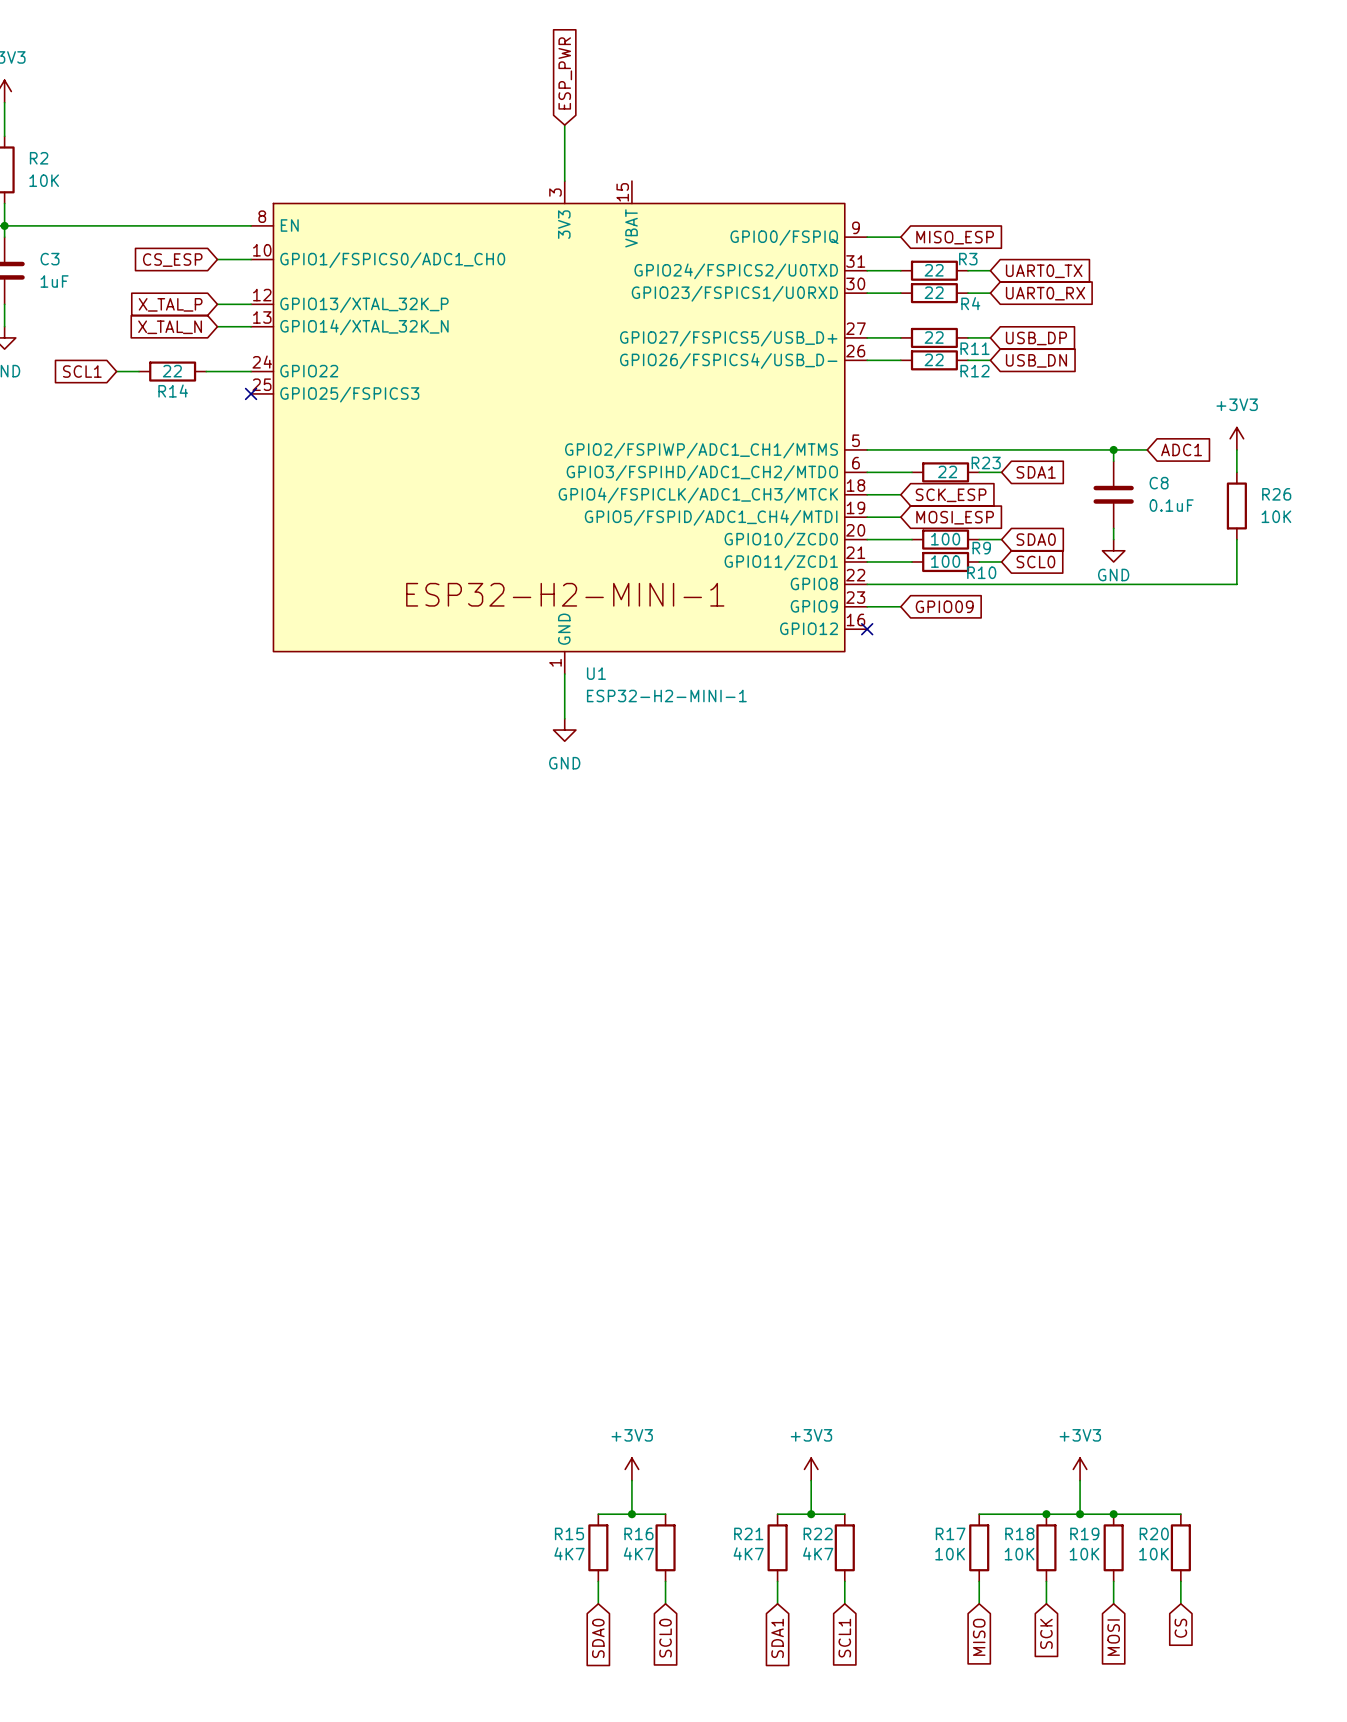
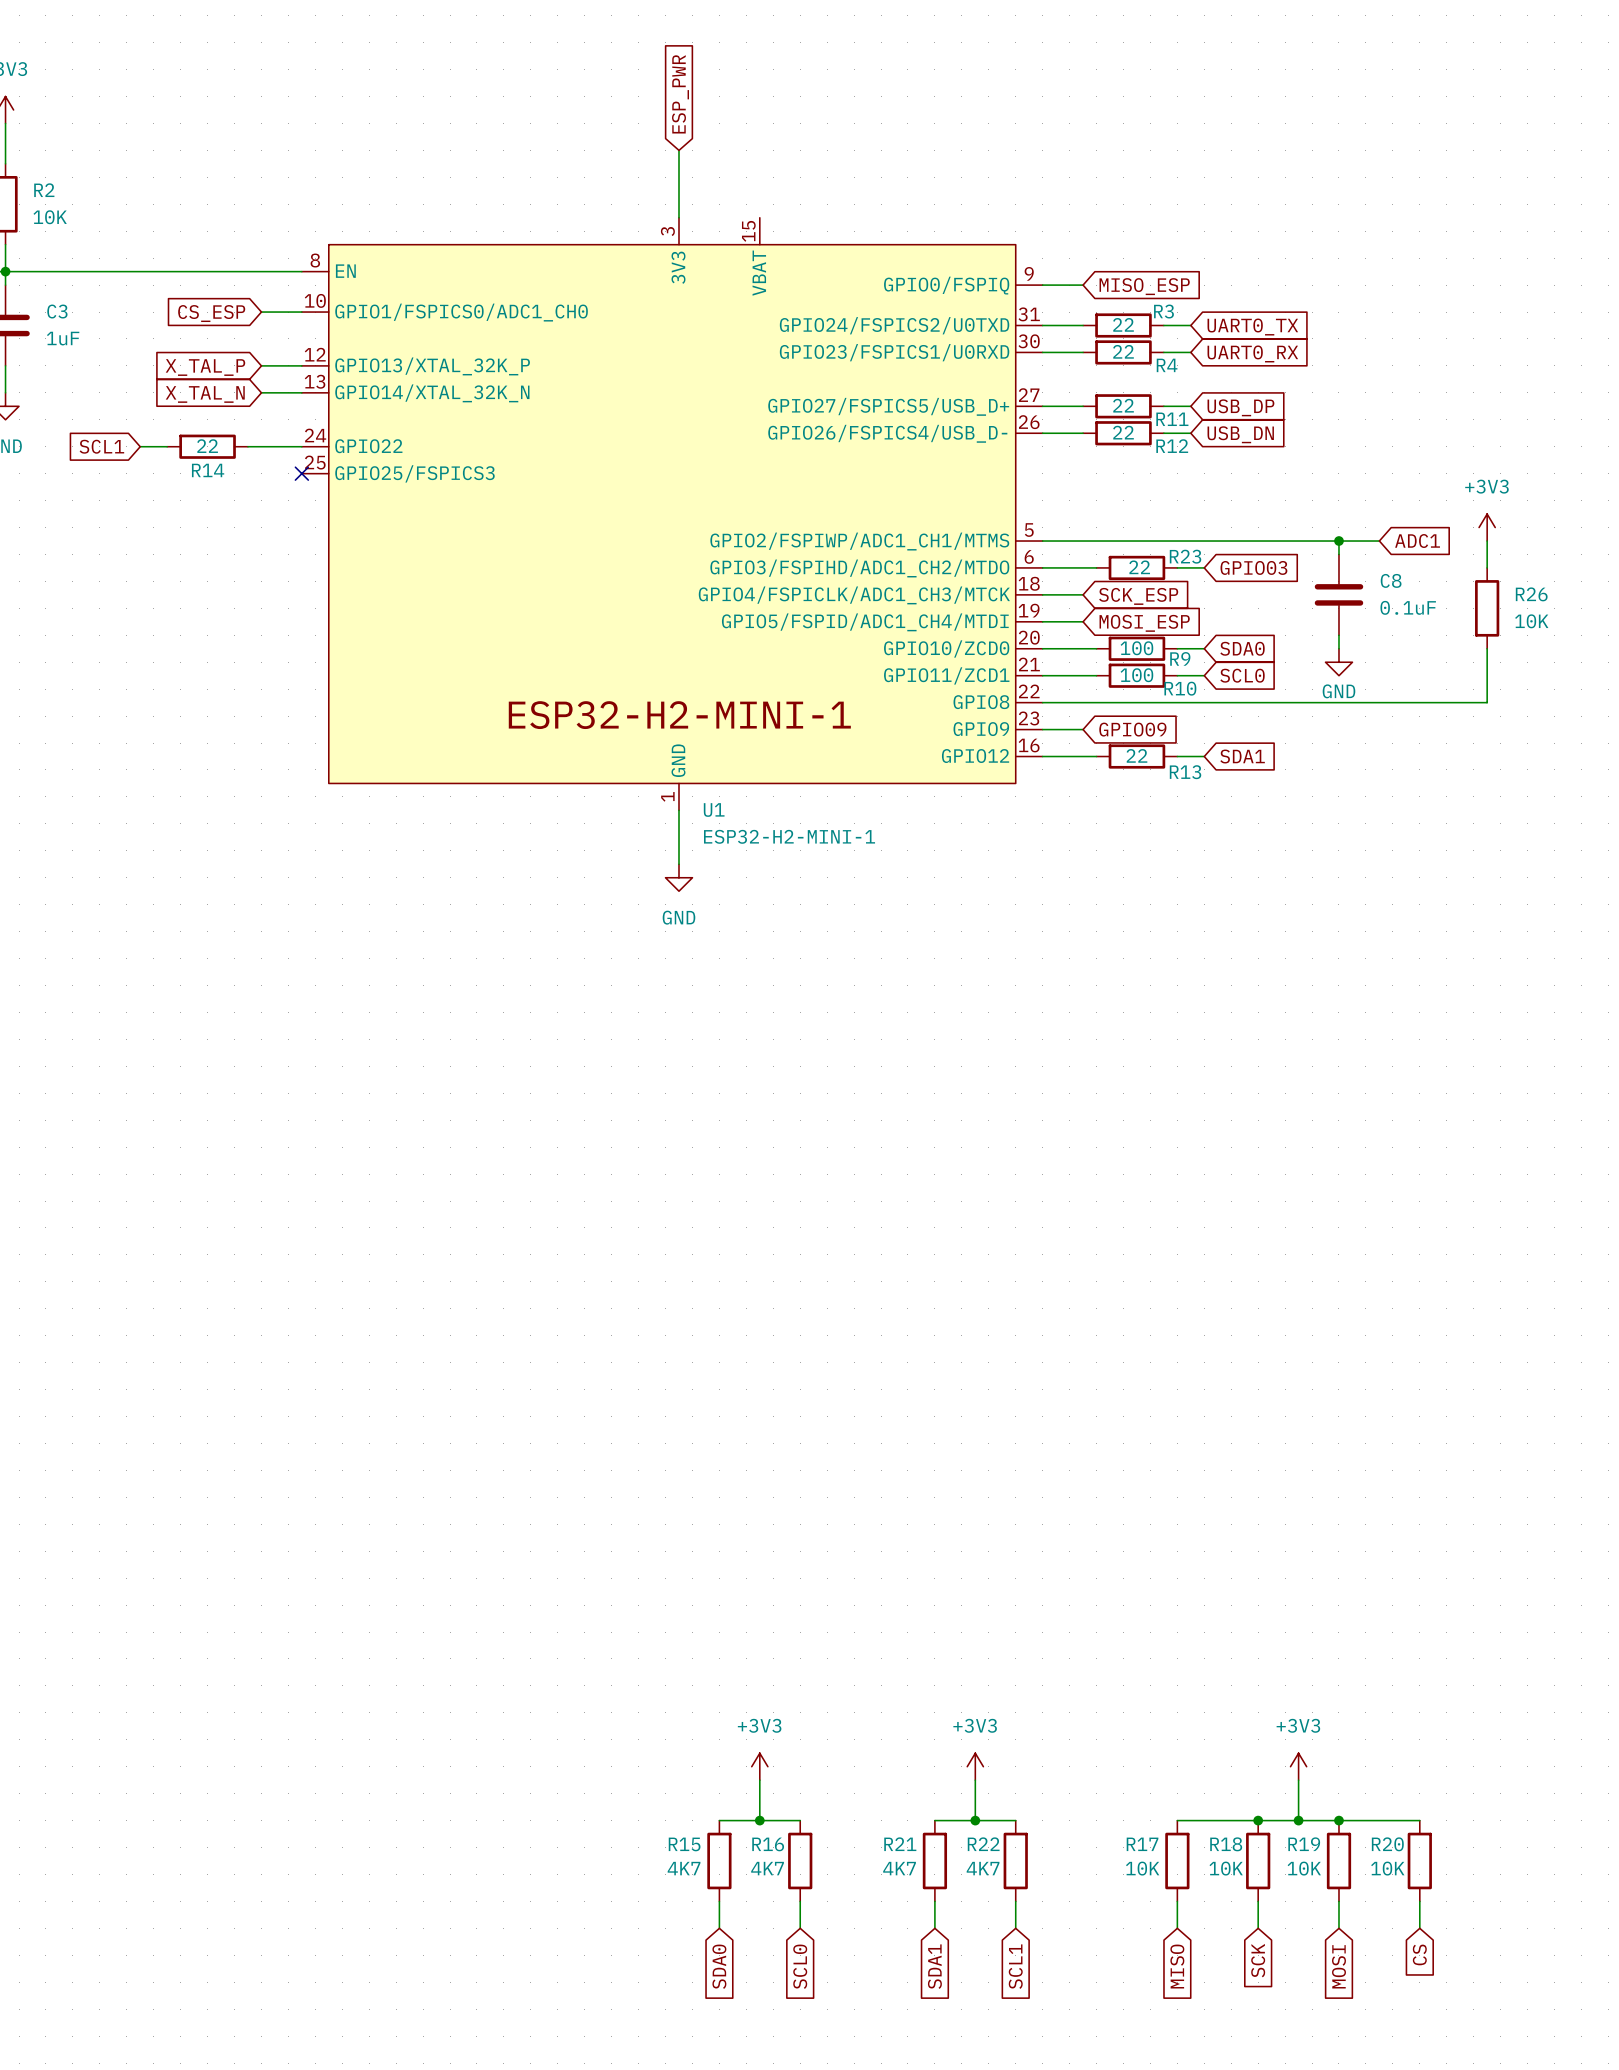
global label: SDA1 (1036, 472) -> GPIO03 (1253, 567)
wire: none -> (1042, 756) (1096, 756)
no-connect mark: (867, 629) -> none
R13: none -> 22 (1136, 756)
wire: none -> (1177, 756) (1204, 756)
global label: none -> SDA1 (1242, 756)

